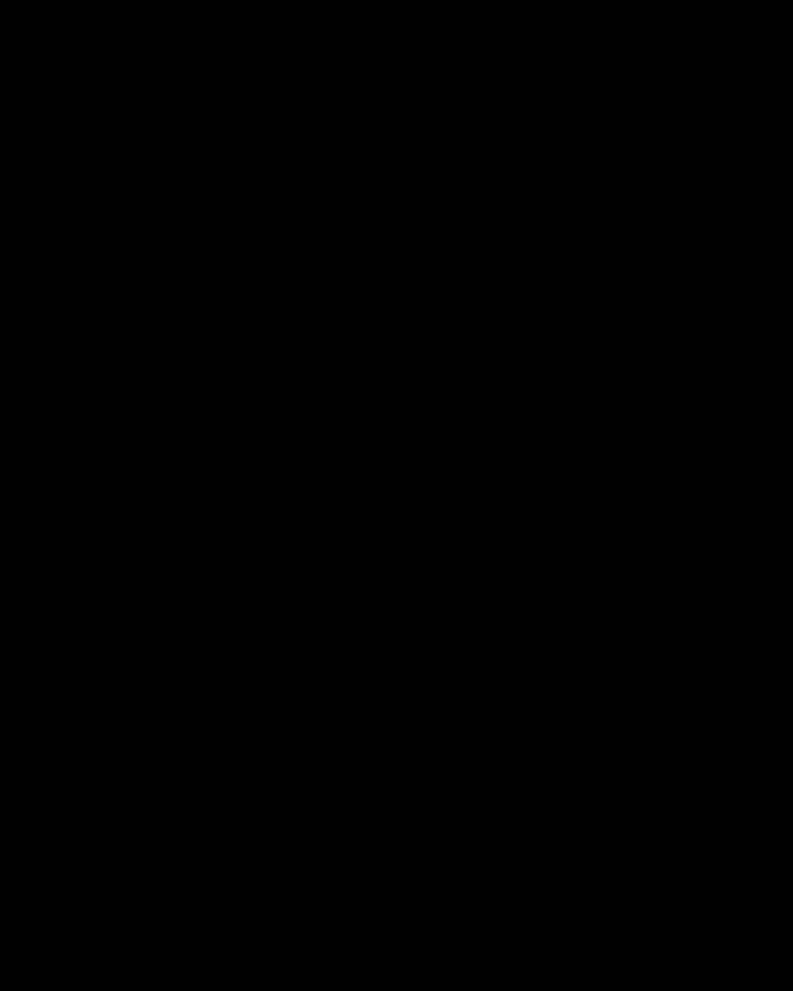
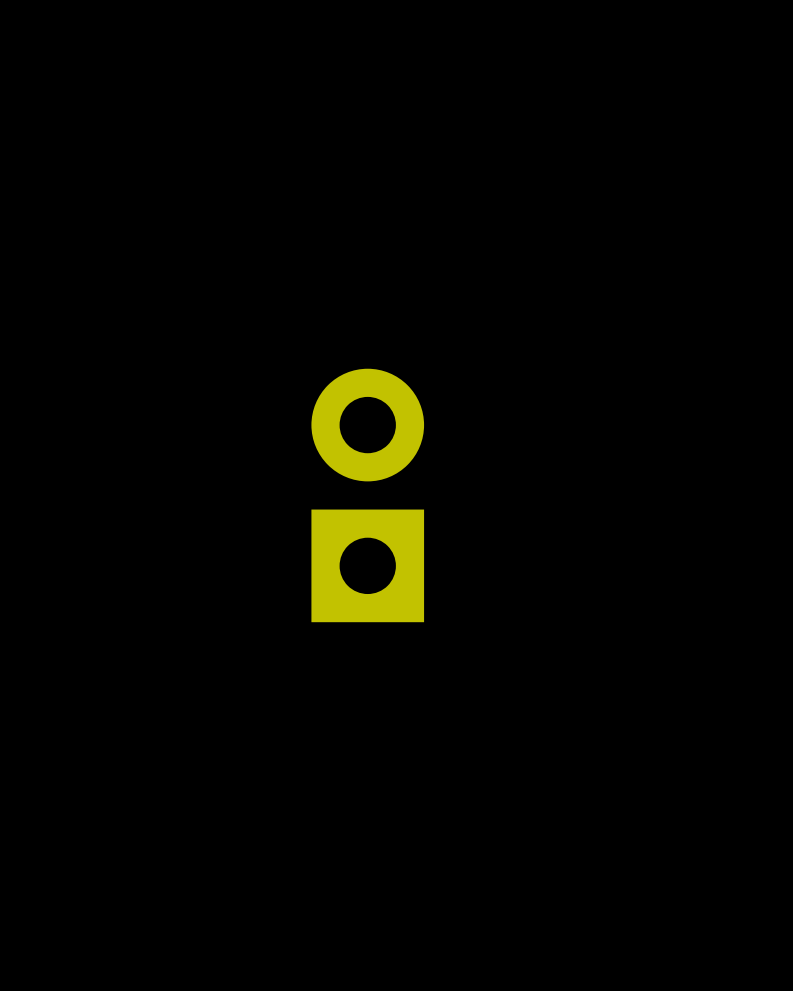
part: none -> (367, 495)

